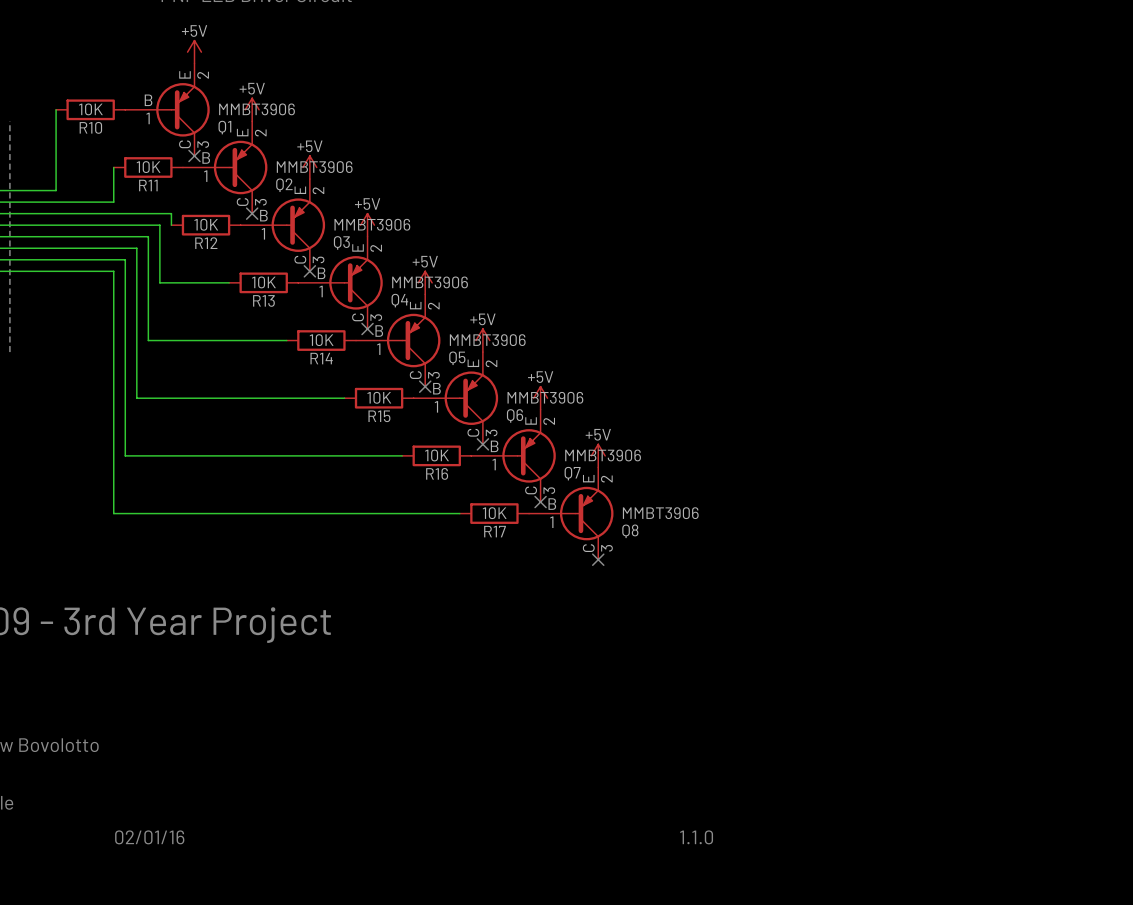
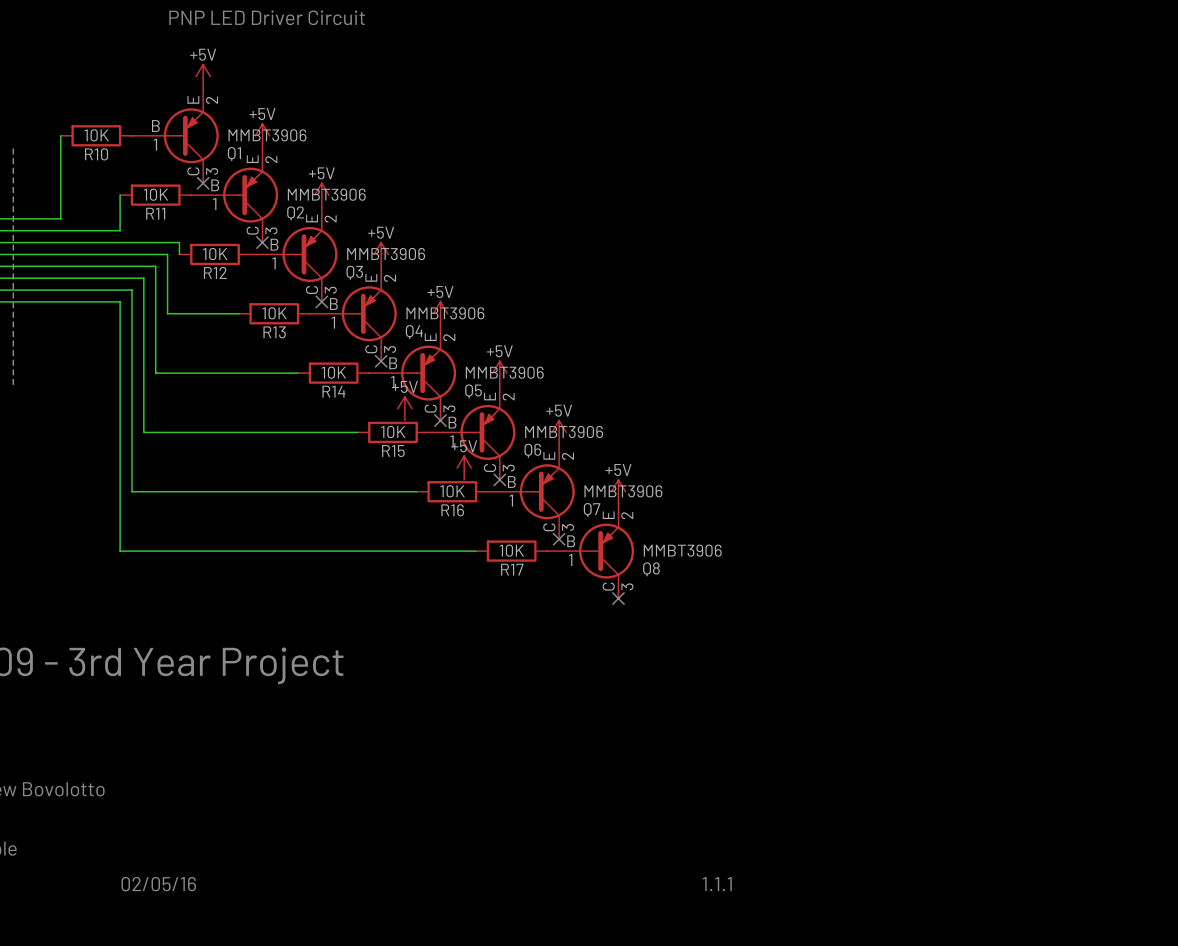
power symbol: none -> +5V (404, 408)
power symbol: none -> +5V (464, 468)
text: 02/01/16 (149, 837) -> 02/05/16 (158, 884)
text: 1.1.0 (696, 837) -> 1.1.1 (717, 884)

